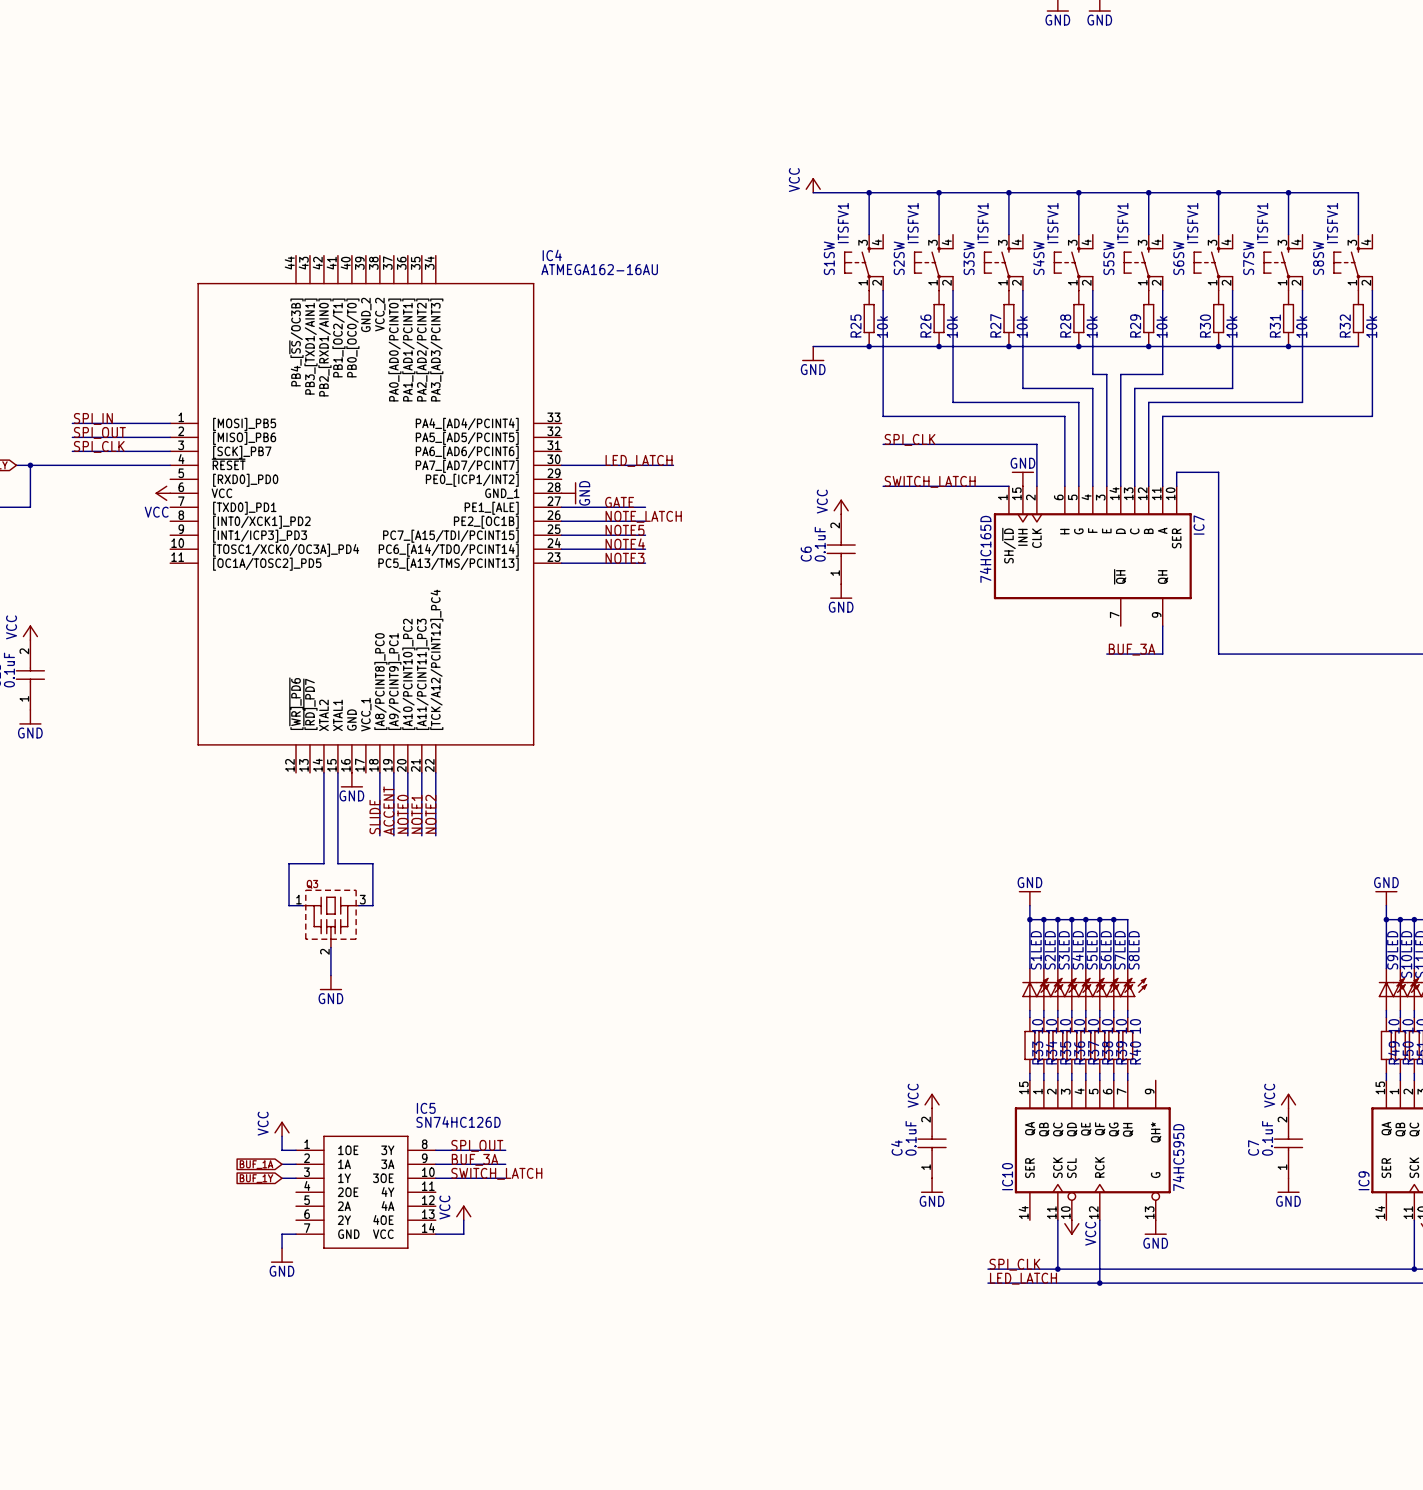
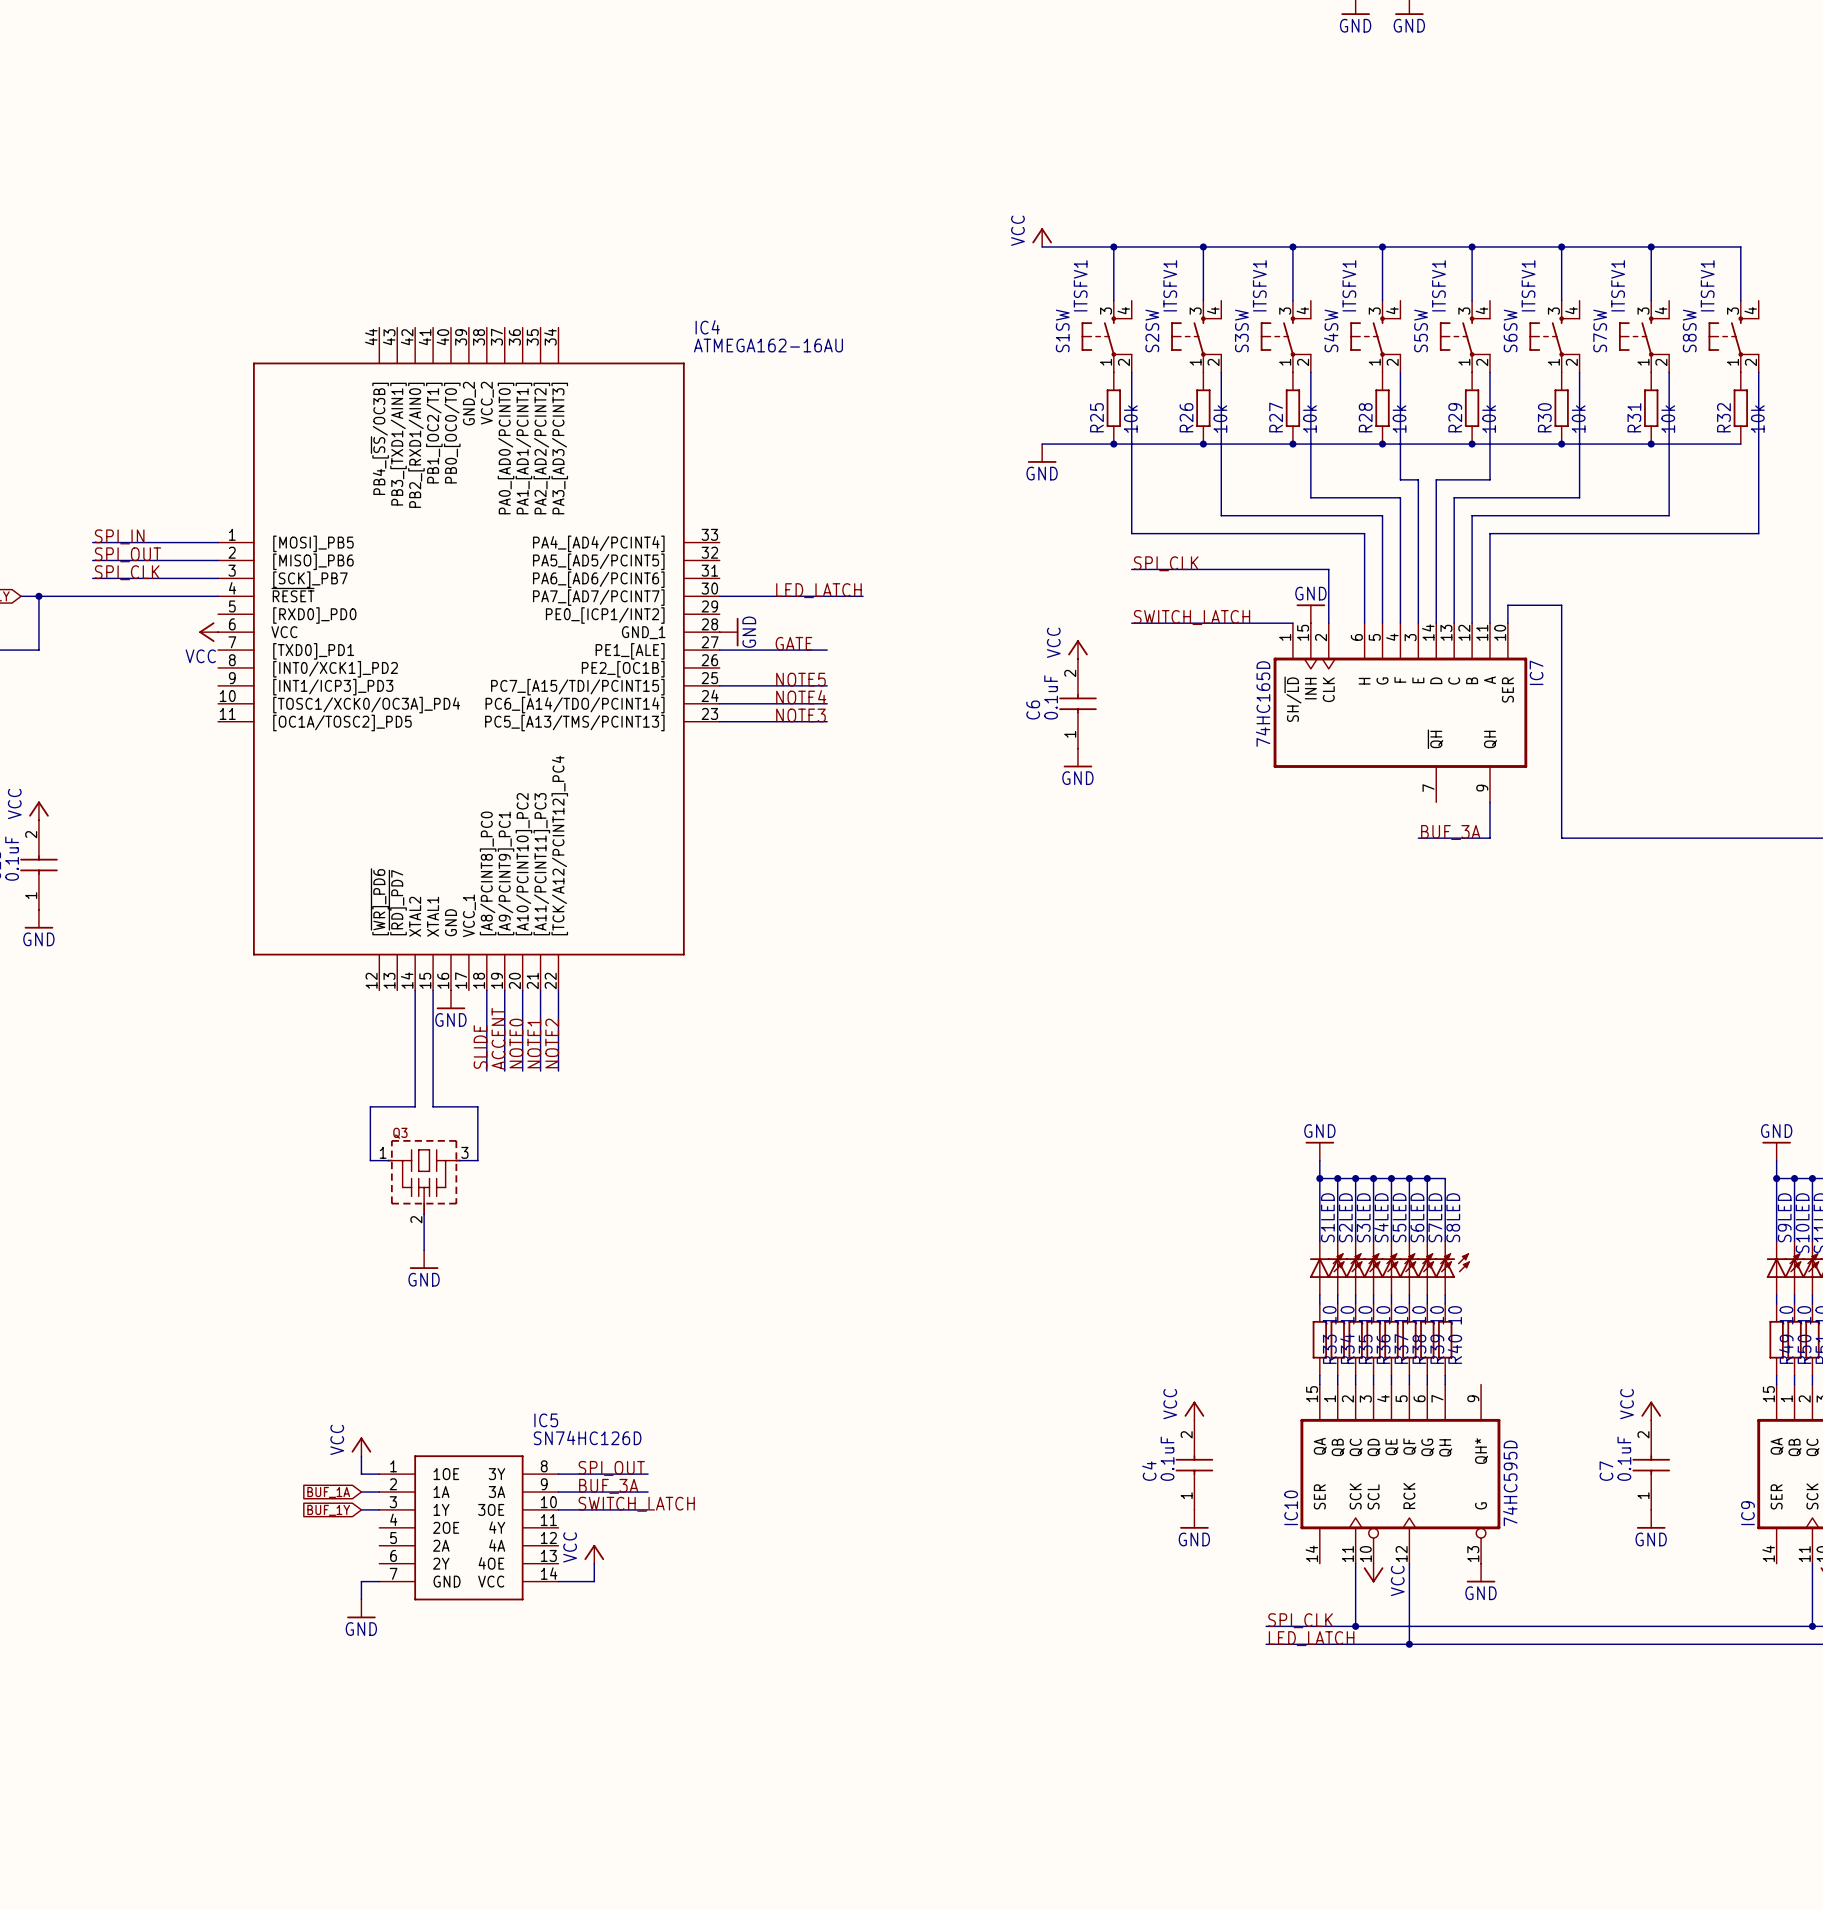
label: NOTE_LATCH (643, 516) -> none
wire: (561, 521) (645, 521) -> none

